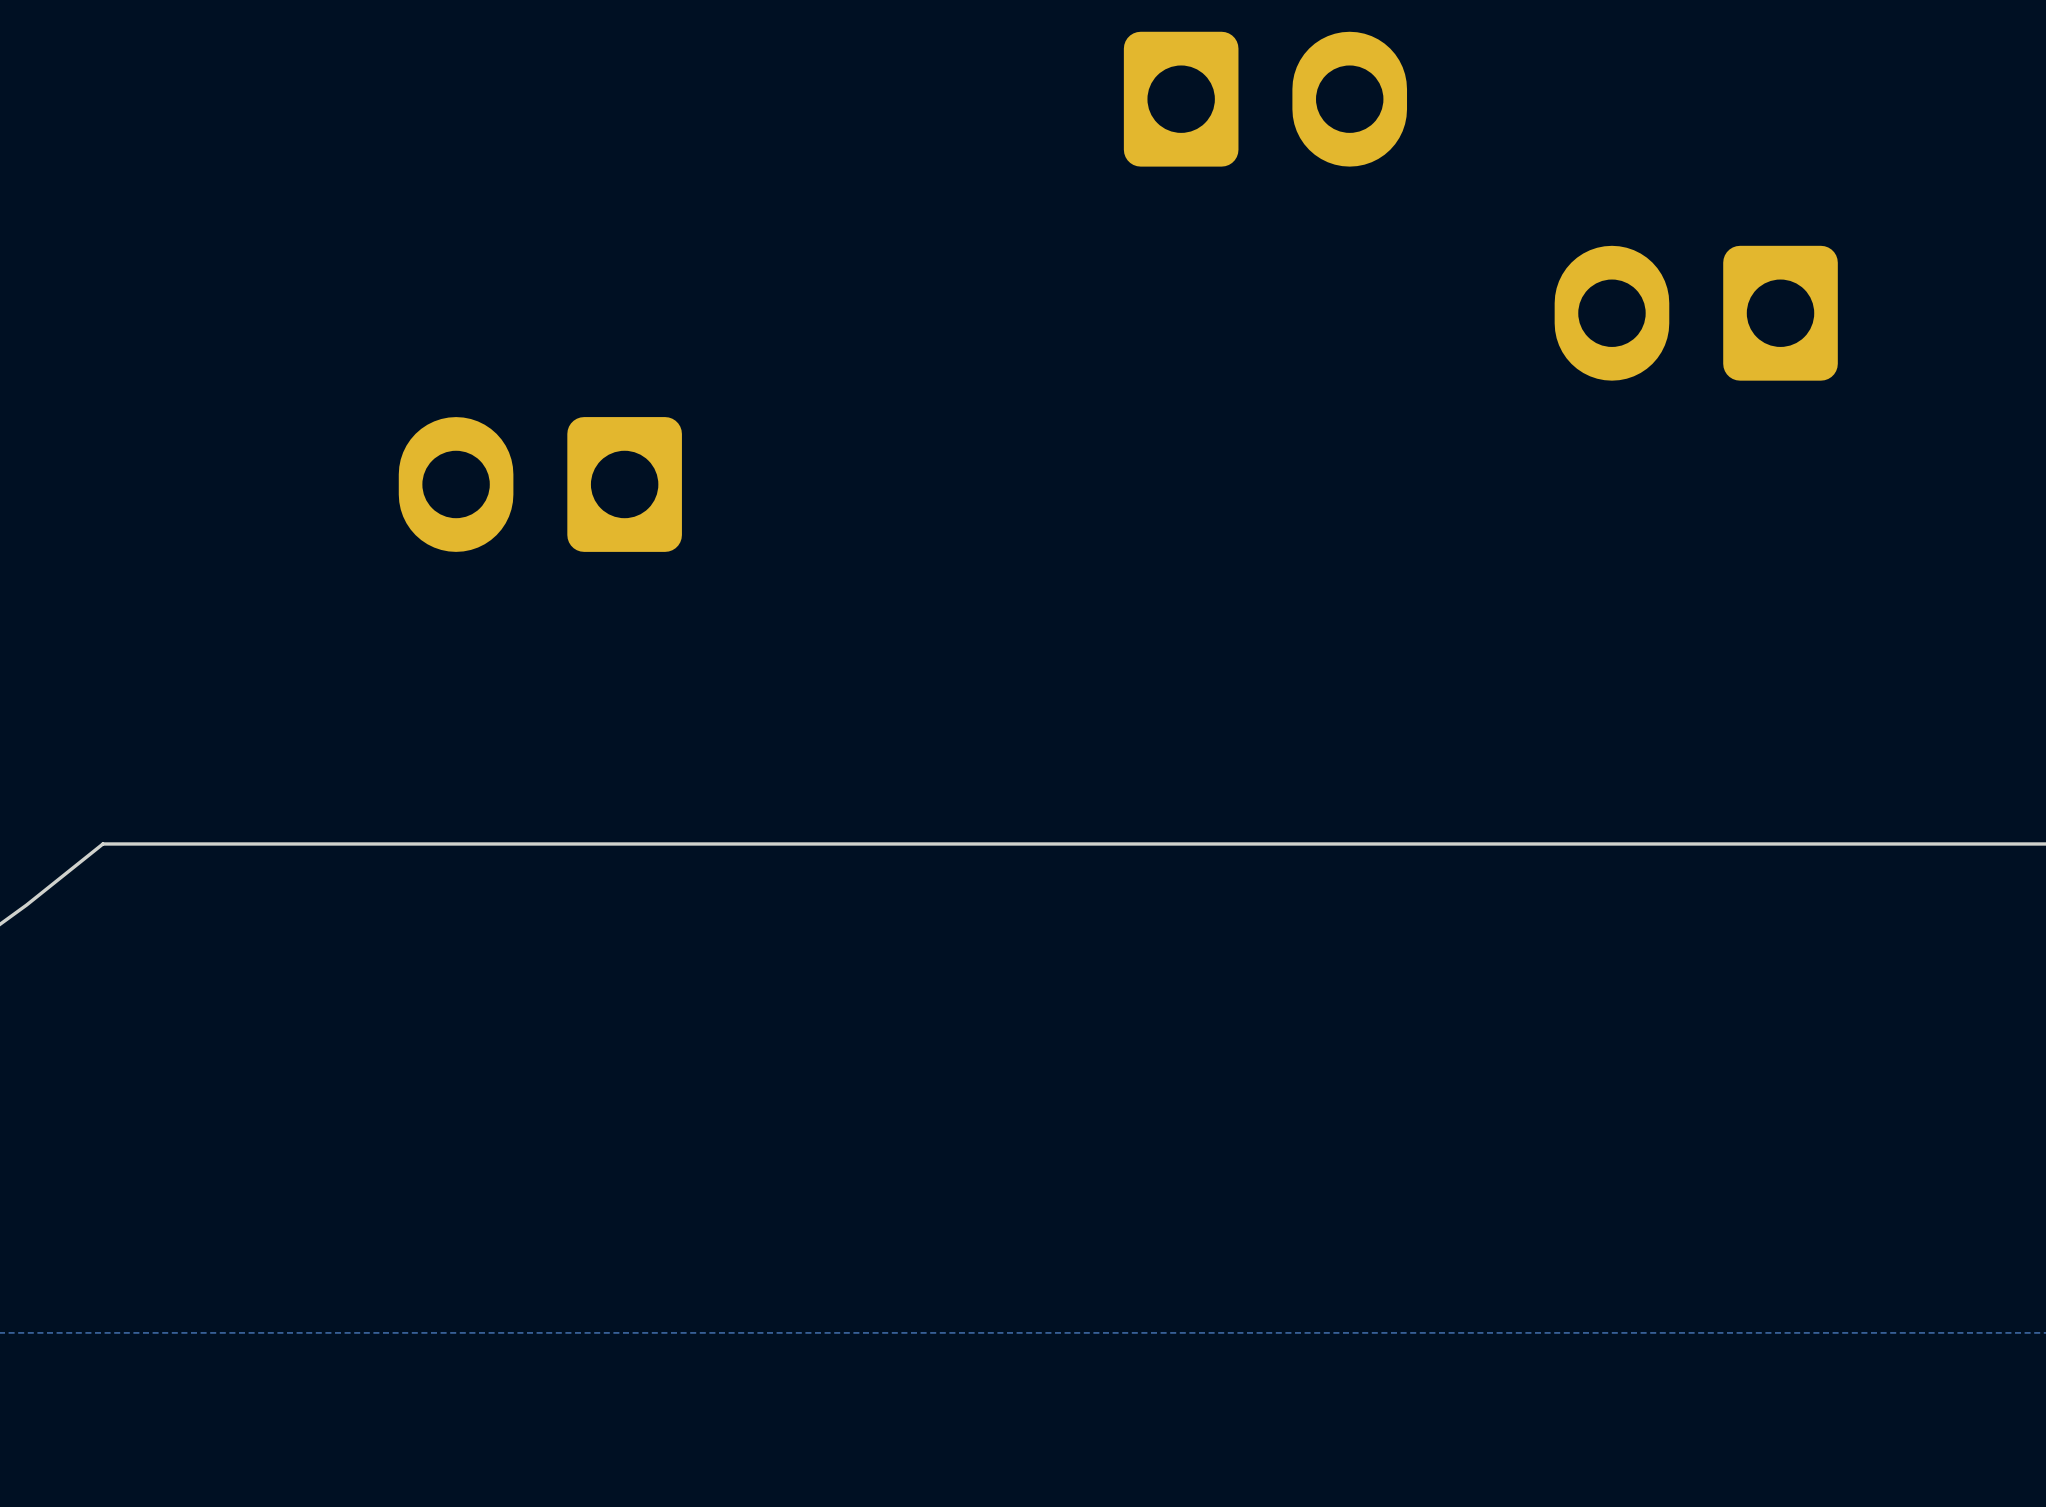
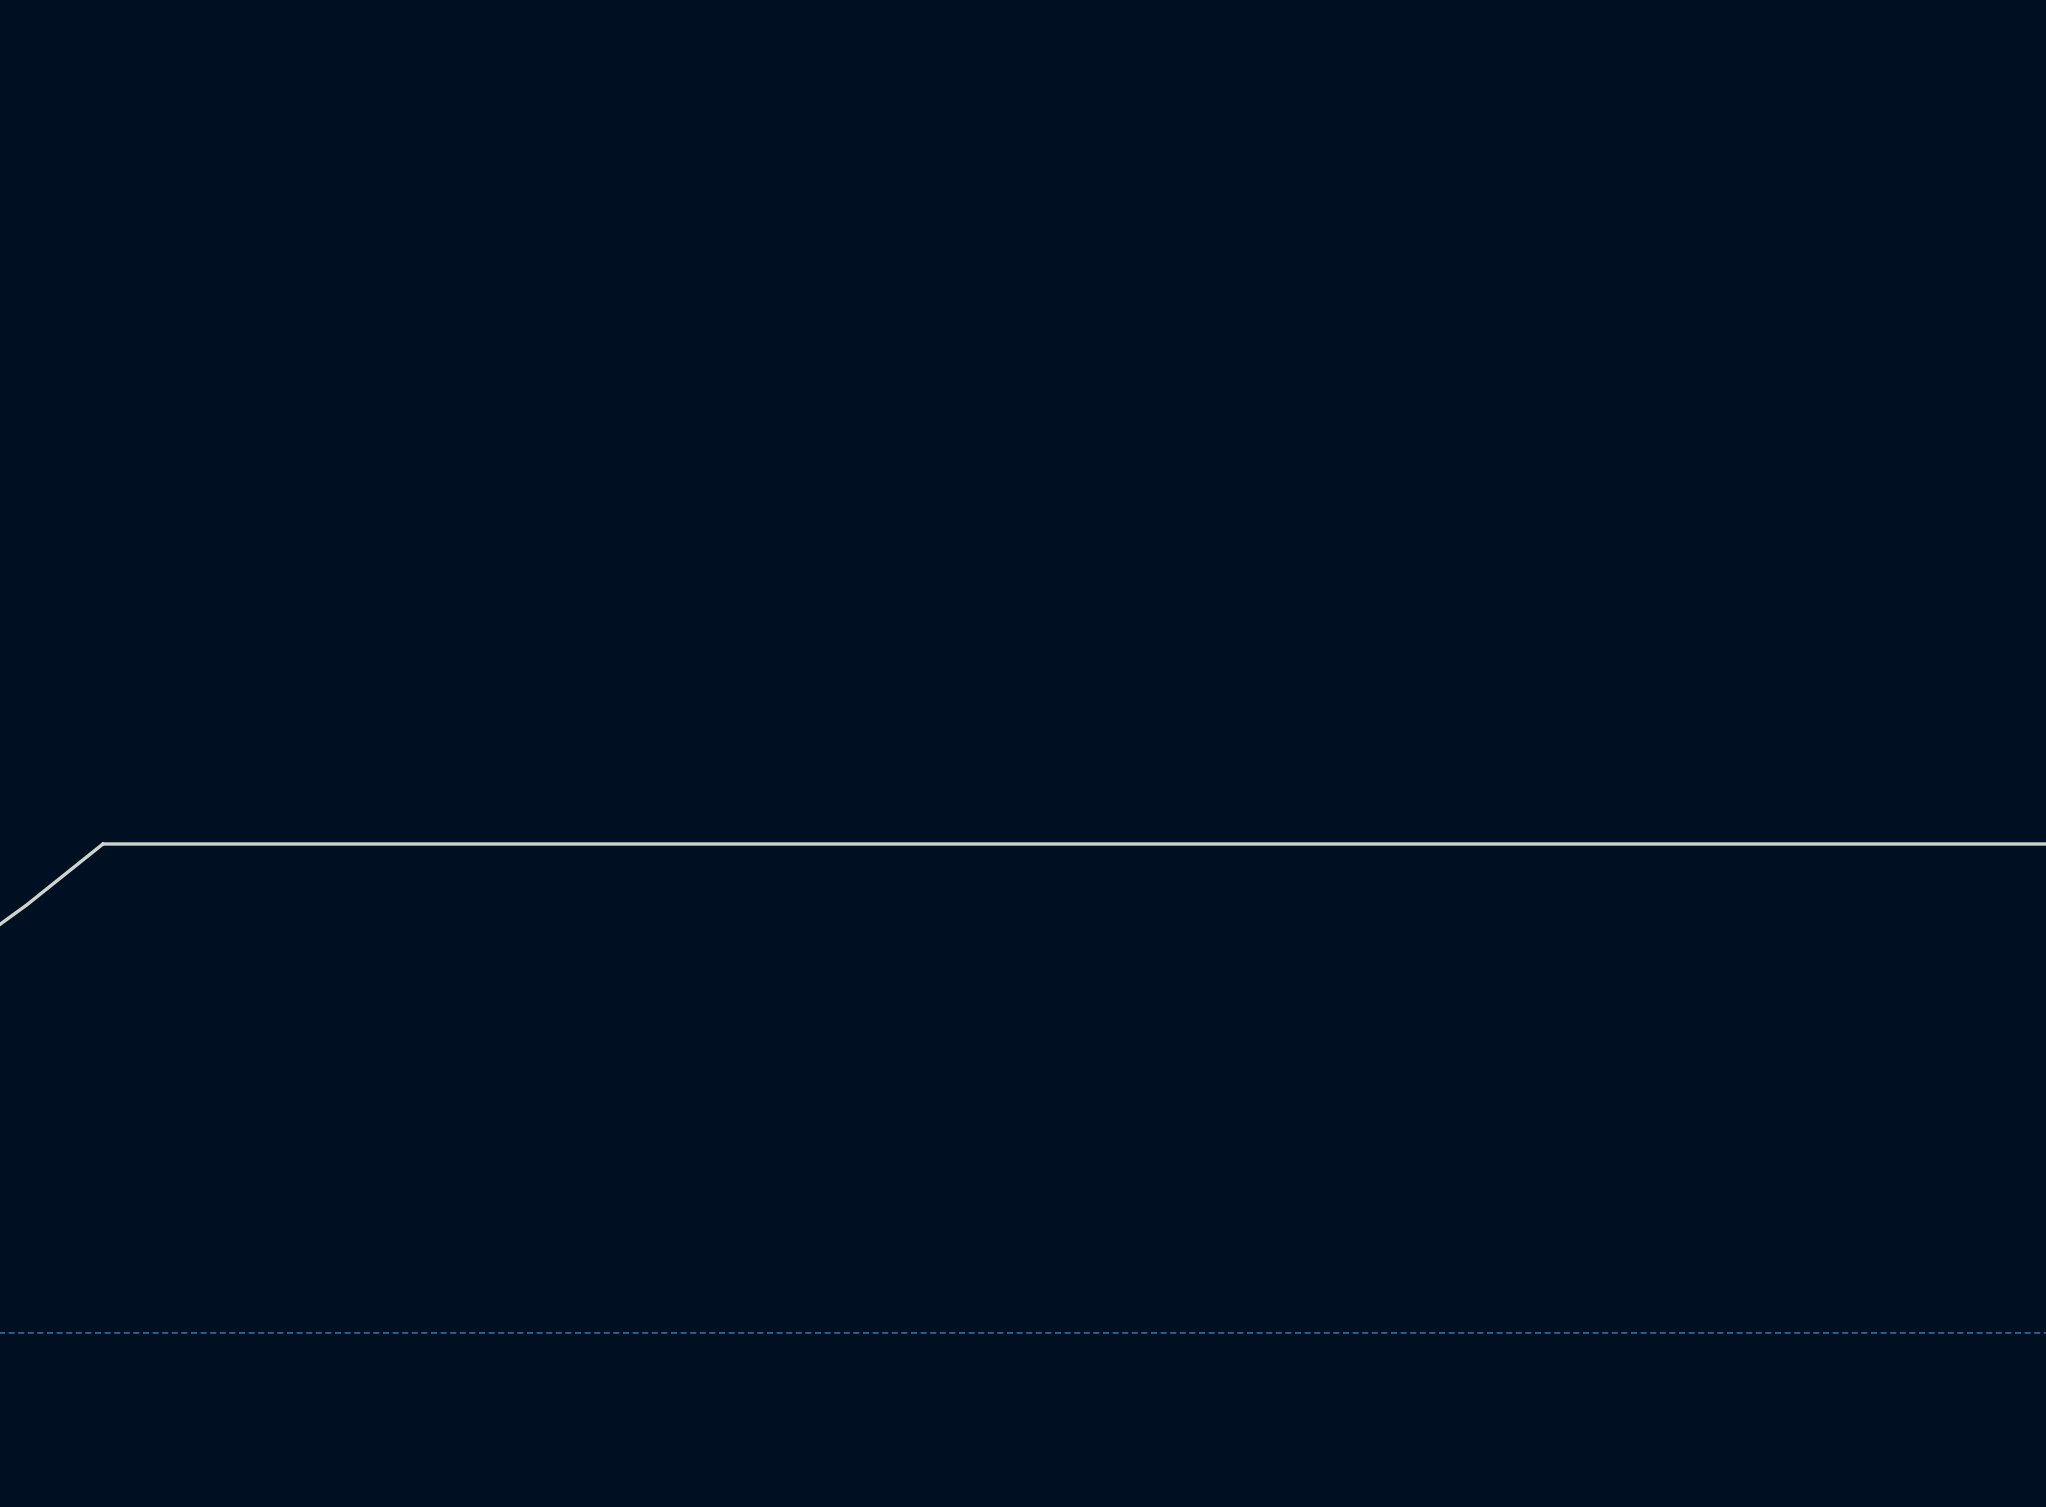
part: (1265, 99) -> none
part: (1696, 313) -> none
part: (540, 484) -> none

